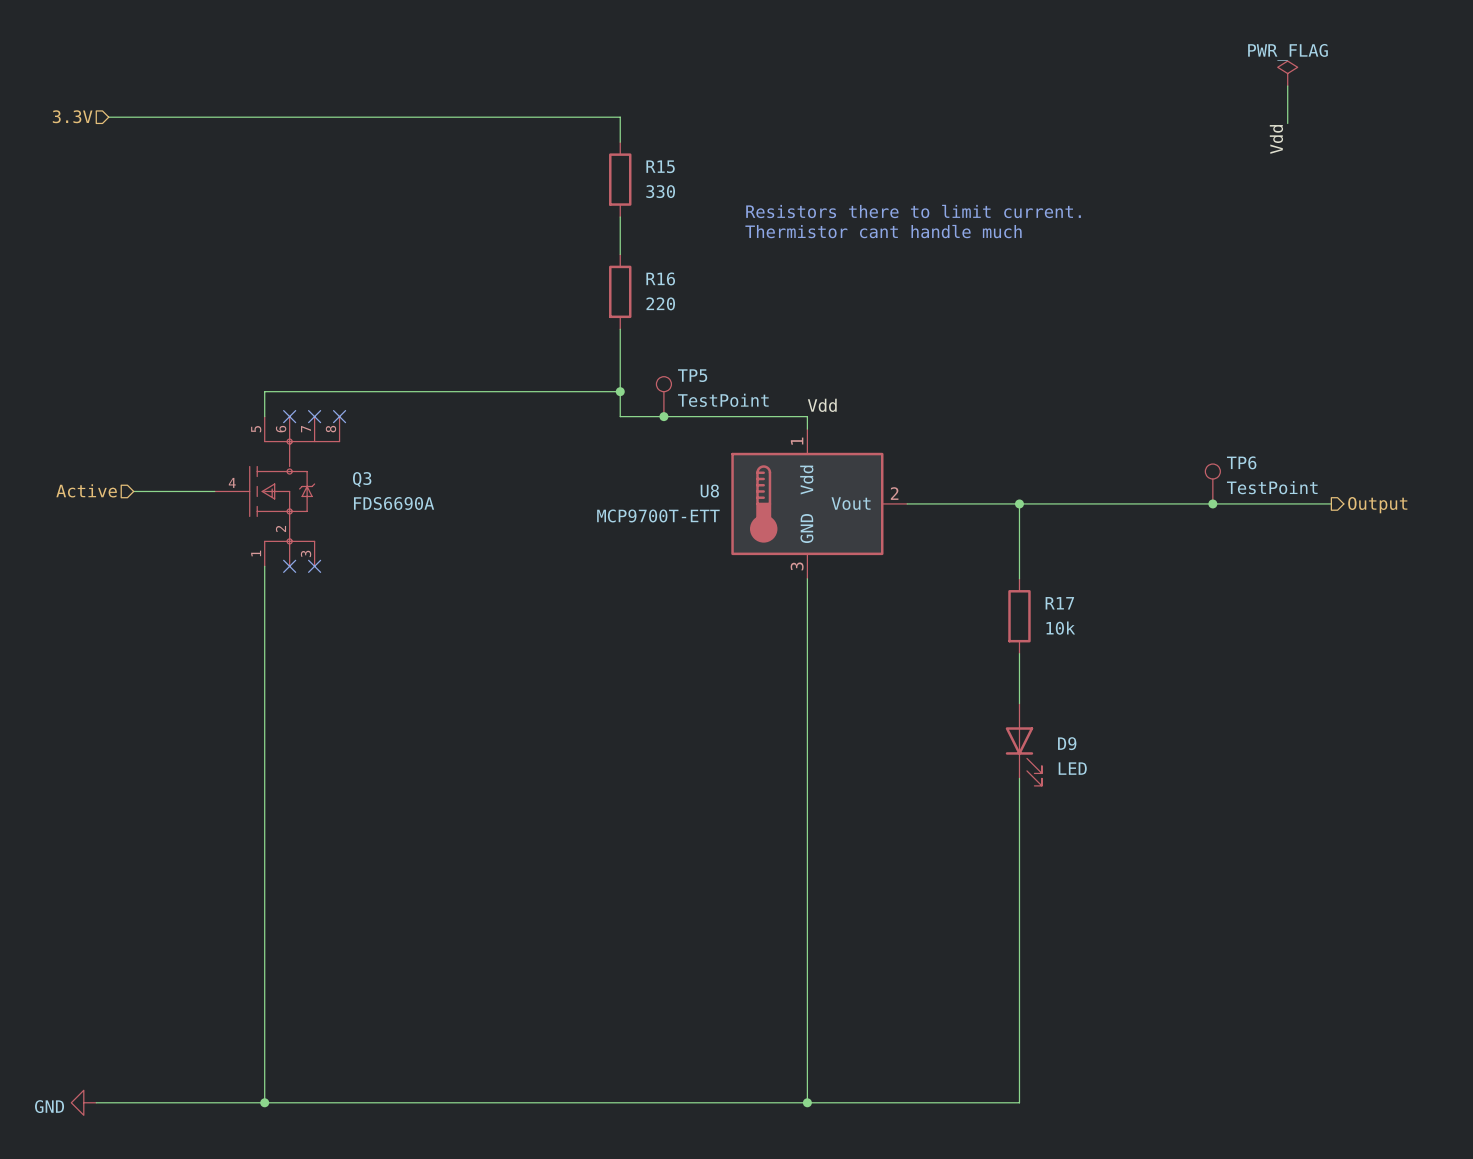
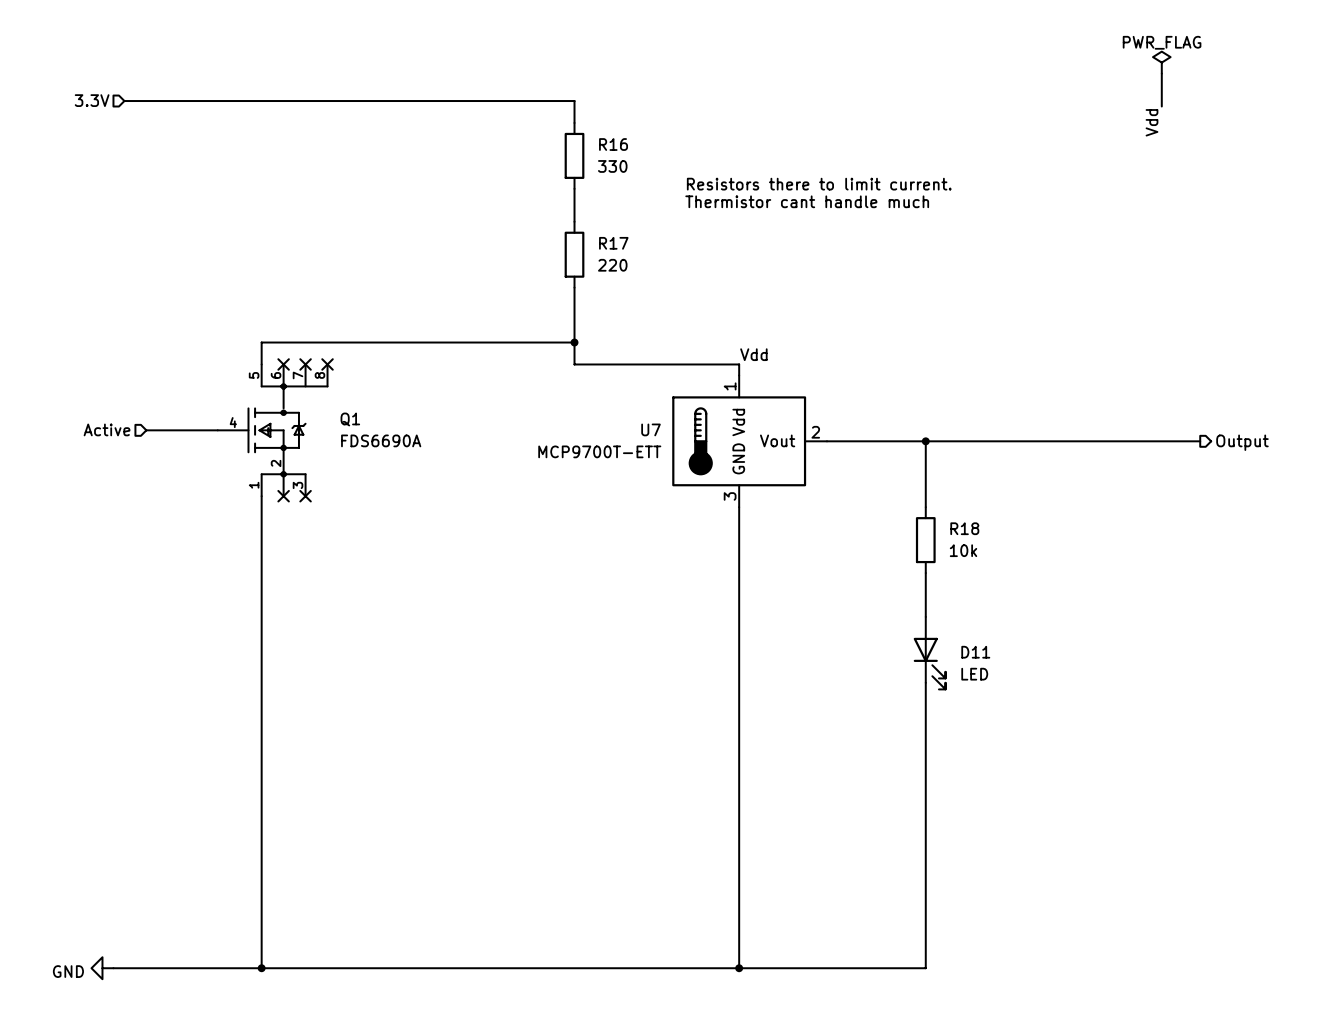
R15 name: R15 (660, 166) -> R16 (613, 144)
R16 name: R16 (660, 278) -> R17 (613, 243)
TP5: TestPoint (663, 396) -> none
junction: (663, 416) -> none
Q3 name: Q3 (362, 479) -> Q1 (350, 419)
TP6: TestPoint (1212, 483) -> none
U8 name: U8 (709, 491) -> U7 (651, 429)
junction: (1212, 503) -> none
R17 name: R17 (1059, 603) -> R18 (964, 528)
D9 name: D9 (1067, 743) -> D11 (975, 652)

